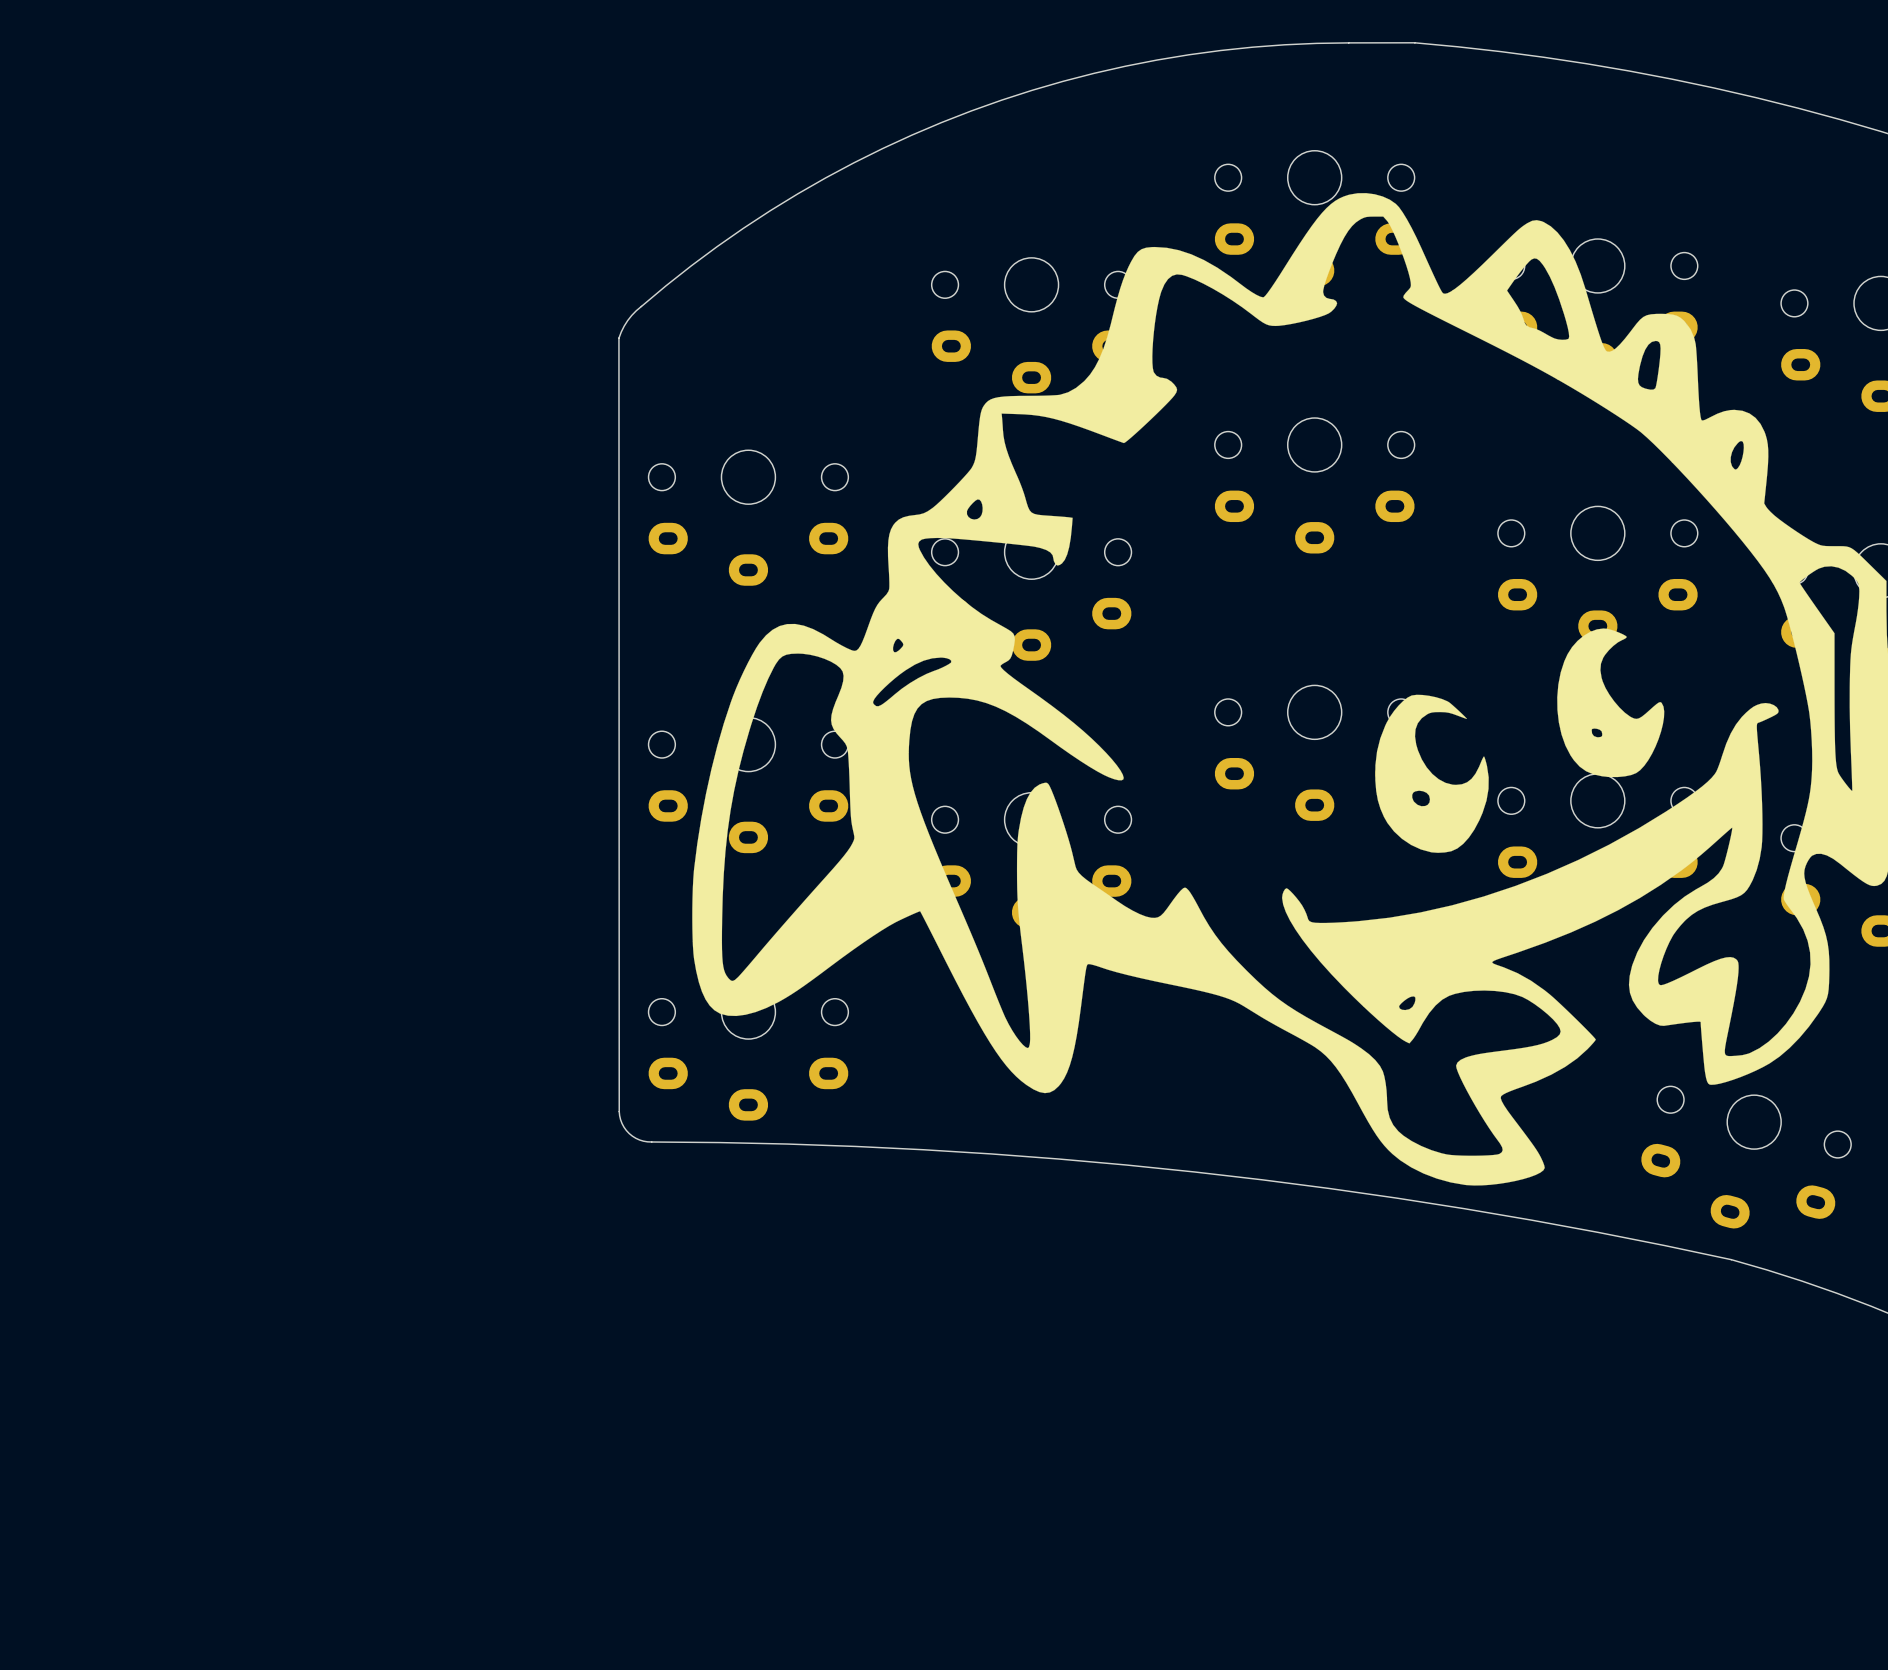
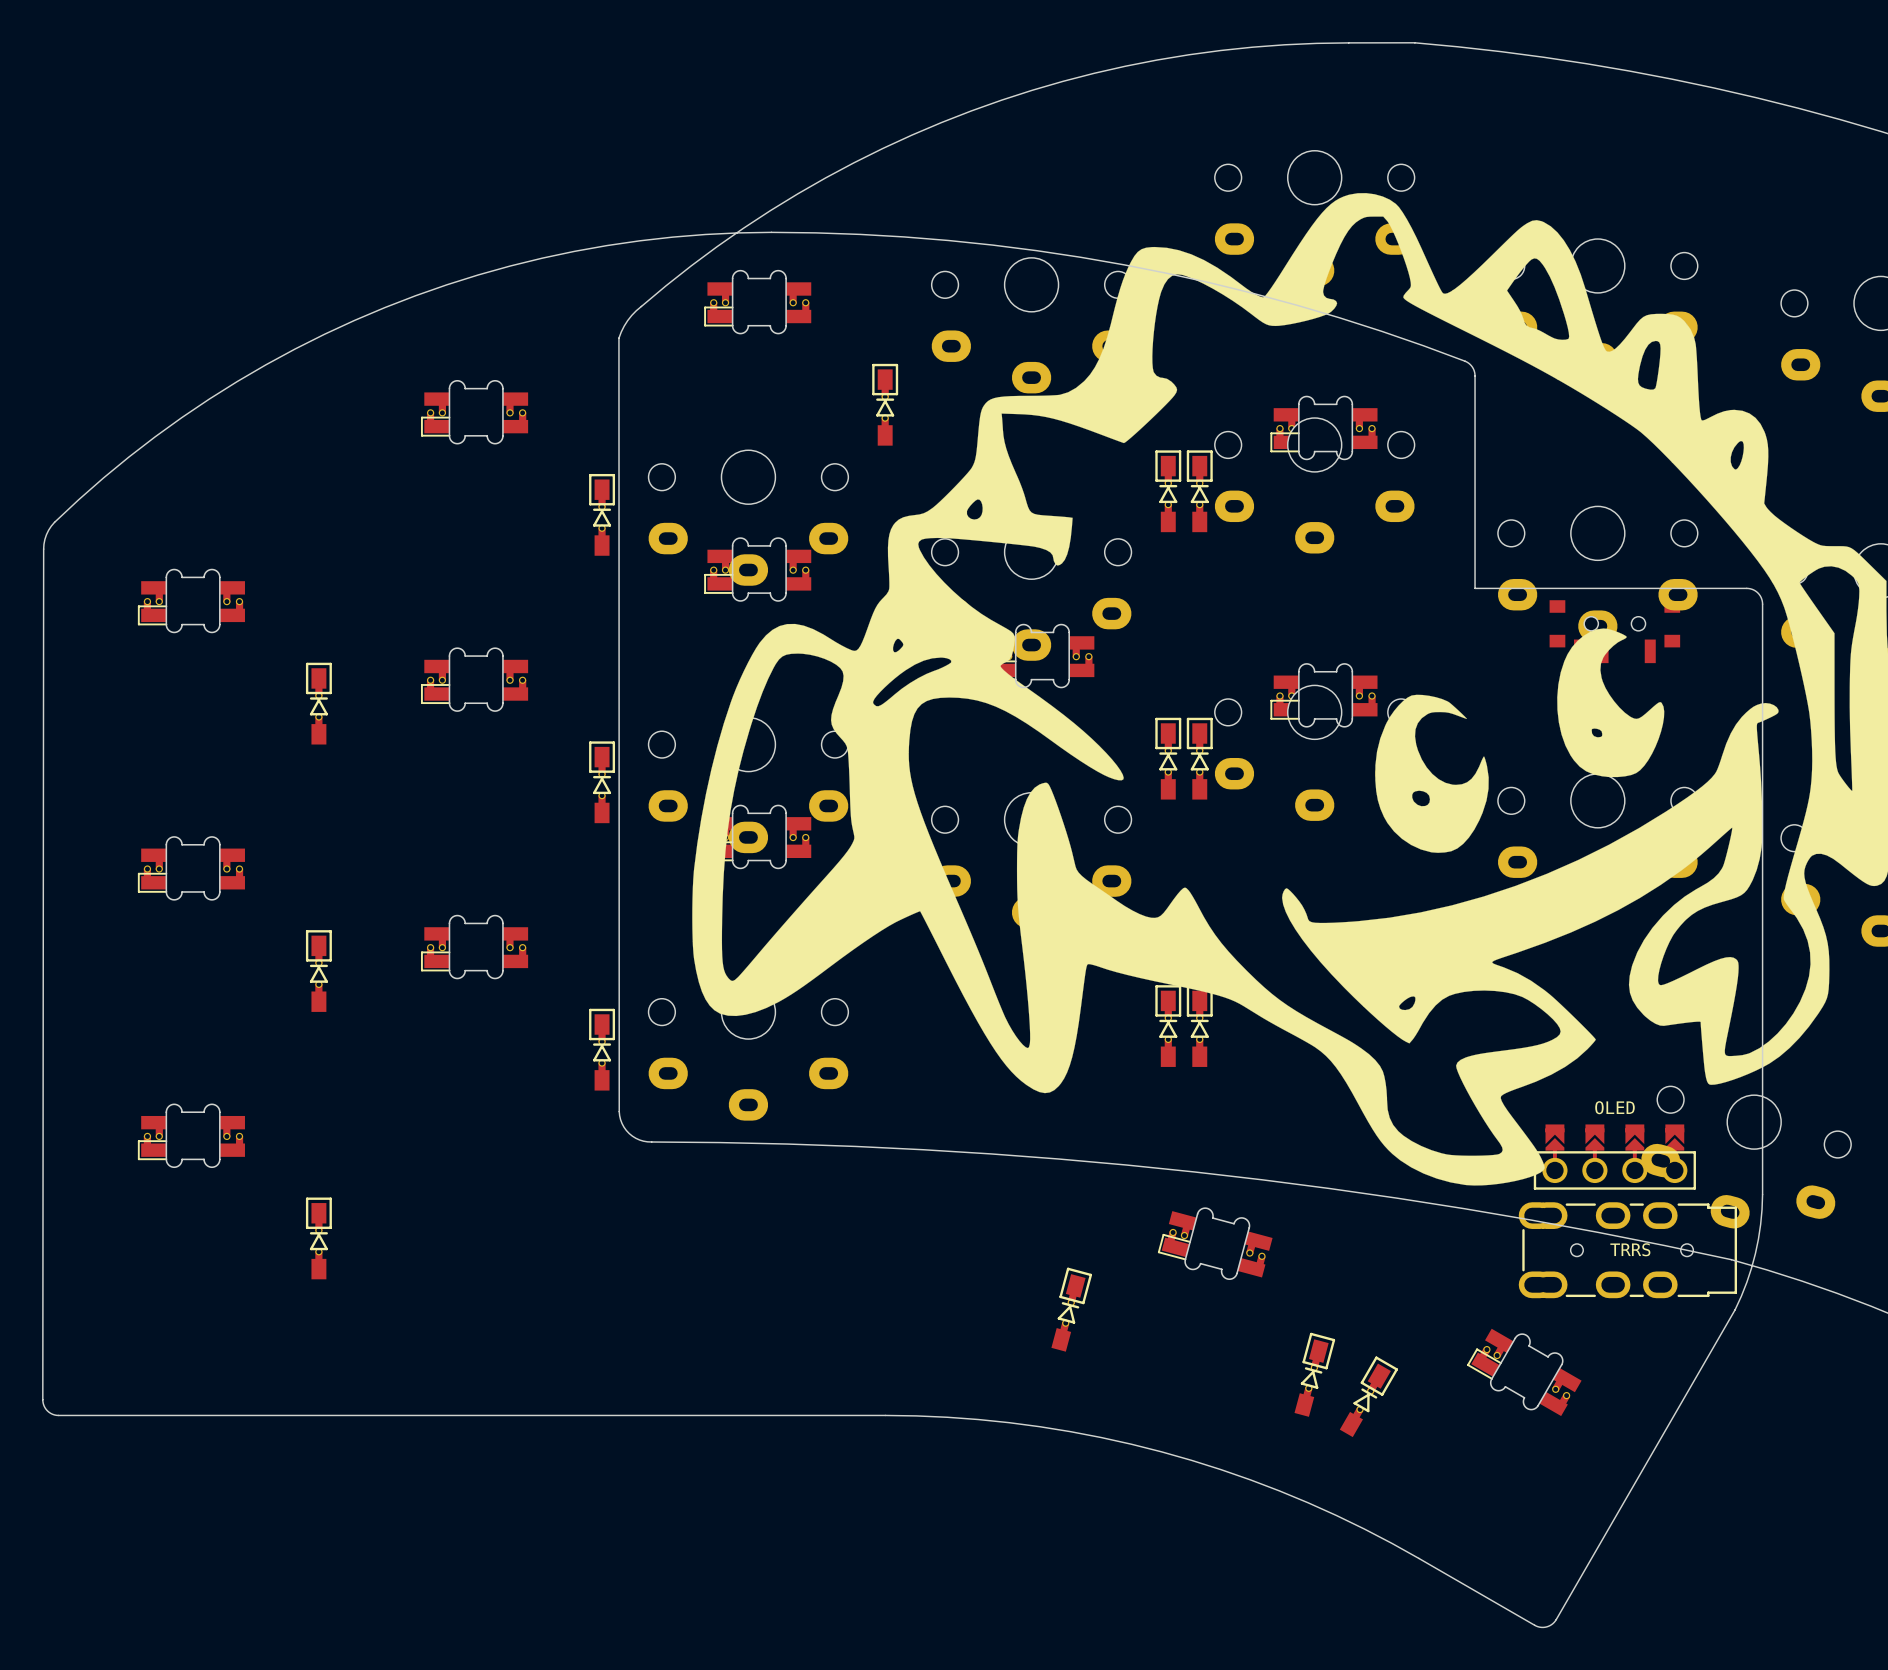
board edge: none -> (771, 232) (860, 234) (948, 240) (1036, 250) (1124, 264) (1211, 283) (1297, 305) (1423, 345) (1467, 362) (1474, 372) (1475, 588) (1746, 588) (1755, 590) (1760, 595) (1762, 604) (1762, 1194) (1758, 1239) (1746, 1282) (1735, 1309) (1556, 1619) (1550, 1625) (1543, 1627) (1536, 1626) (1391, 1543) (1336, 1515) (1279, 1490) (1221, 1469) (1161, 1451) (1101, 1437) (1039, 1426) (978, 1419) (916, 1415) (58, 1415) (50, 1413) (44, 1407) (42, 1399) (43, 549) (48, 530) (78, 499) (128, 457) (209, 399) (294, 349) (384, 307) (478, 274) (574, 251) (672, 237) (771, 232)
part: none -> (757, 302)
part: none -> (885, 404)
part: none -> (474, 412)
part: none -> (1323, 427)
part: none -> (1168, 491)
part: none -> (1199, 491)
part: none -> (602, 514)
part: none -> (757, 569)
part: none -> (191, 600)
part: none -> (1614, 631)
part: none -> (1040, 656)
part: none -> (474, 679)
part: none -> (1323, 695)
part: none -> (318, 703)
part: none -> (1168, 758)
part: none -> (1199, 758)
part: none -> (602, 782)
part: none -> (757, 836)
part: none -> (191, 868)
part: none -> (474, 947)
part: none -> (318, 971)
part: none -> (1168, 1026)
part: none -> (1199, 1026)
part: none -> (602, 1049)
part: none -> (191, 1135)
part: none -> OLED (1614, 1157)
part: none -> (318, 1238)
part: none -> (1215, 1243)
part: none -> (1627, 1250)
part: none -> (1071, 1309)
part: none -> (1524, 1372)
part: none -> (1314, 1374)
part: none -> (1368, 1396)

